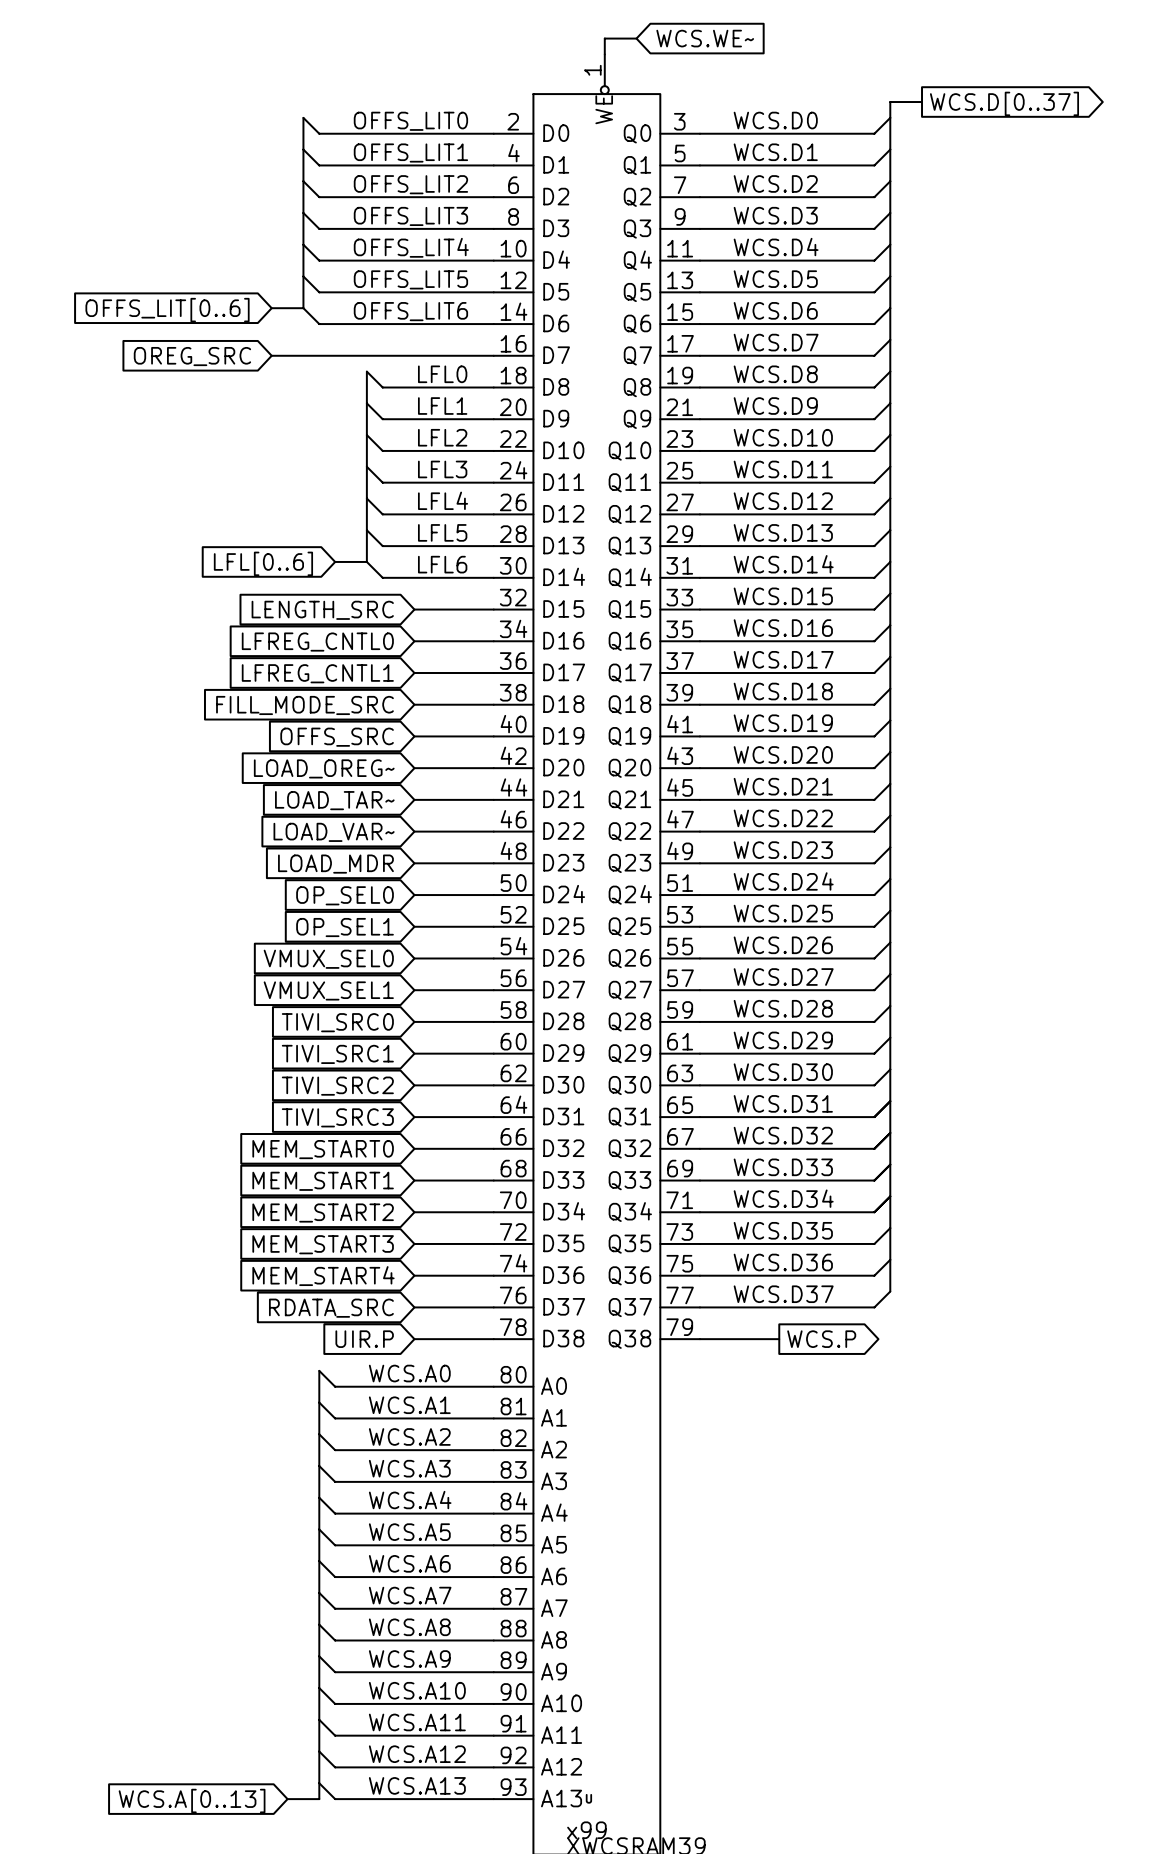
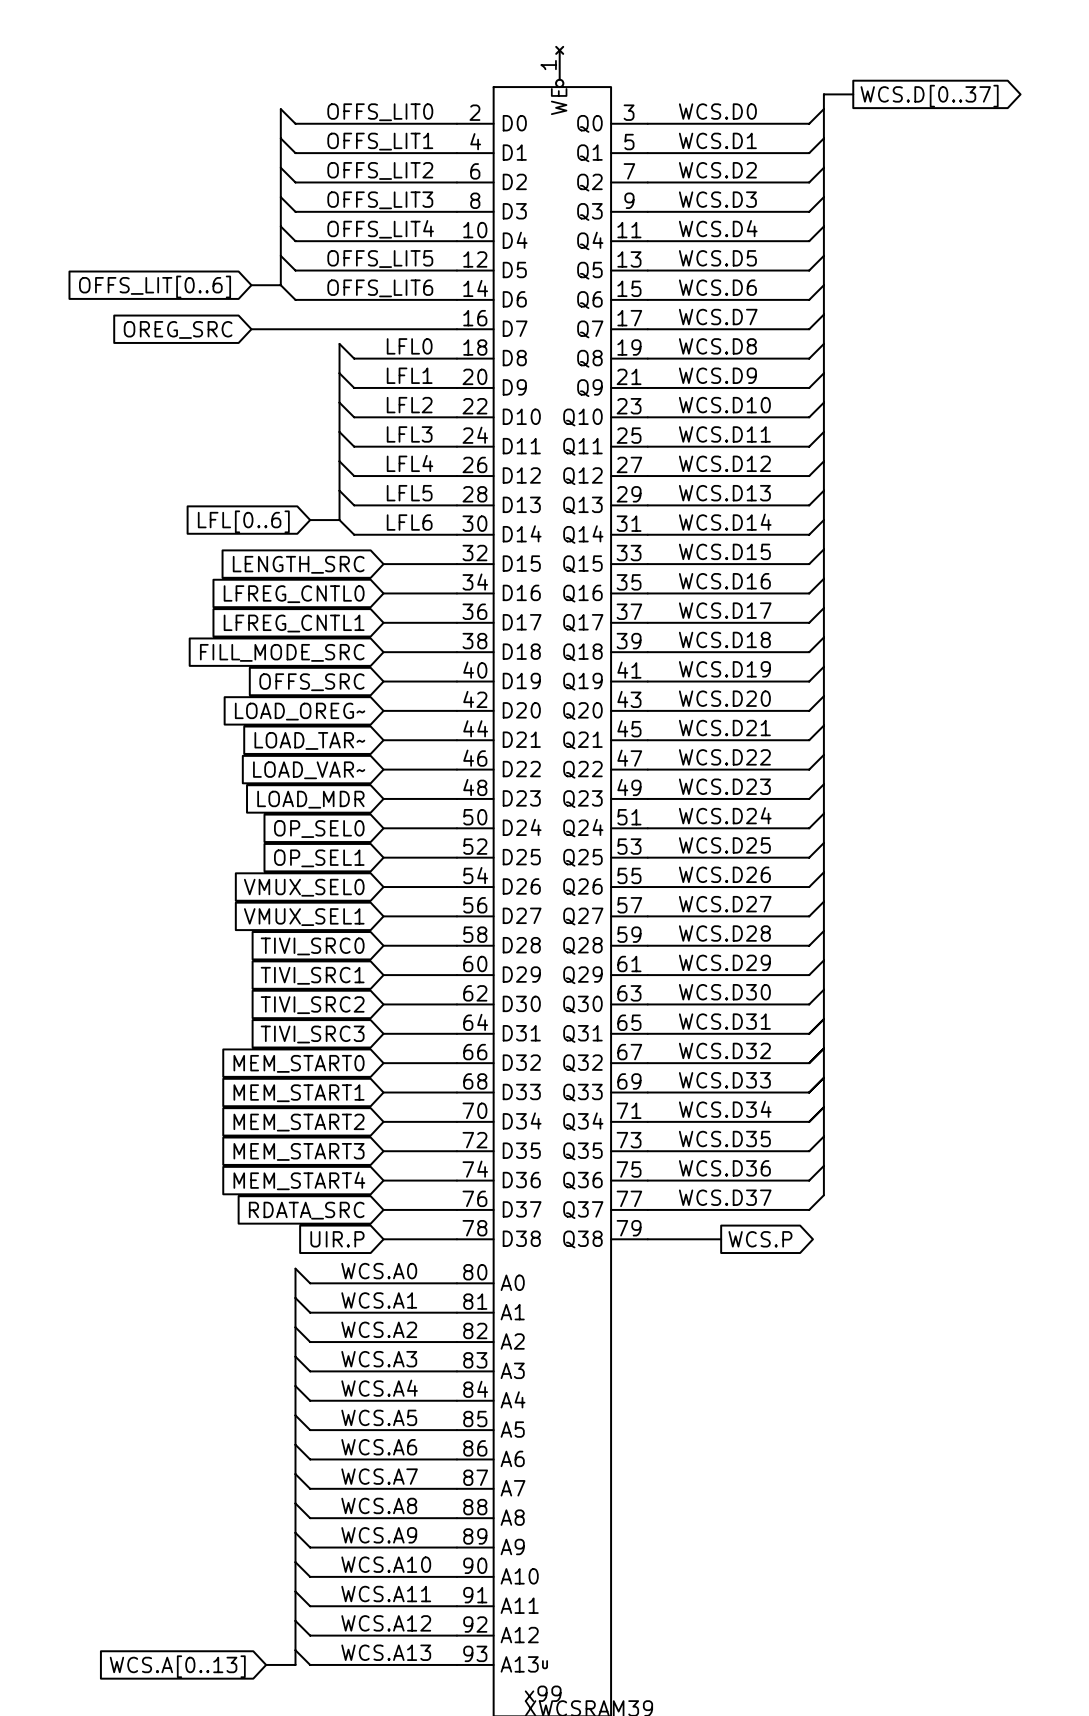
wire: (636, 38) (604, 38) (604, 54) -> none
global label: WCS.WE~ (705, 38) -> none
no-connect mark: none -> (559, 50)

